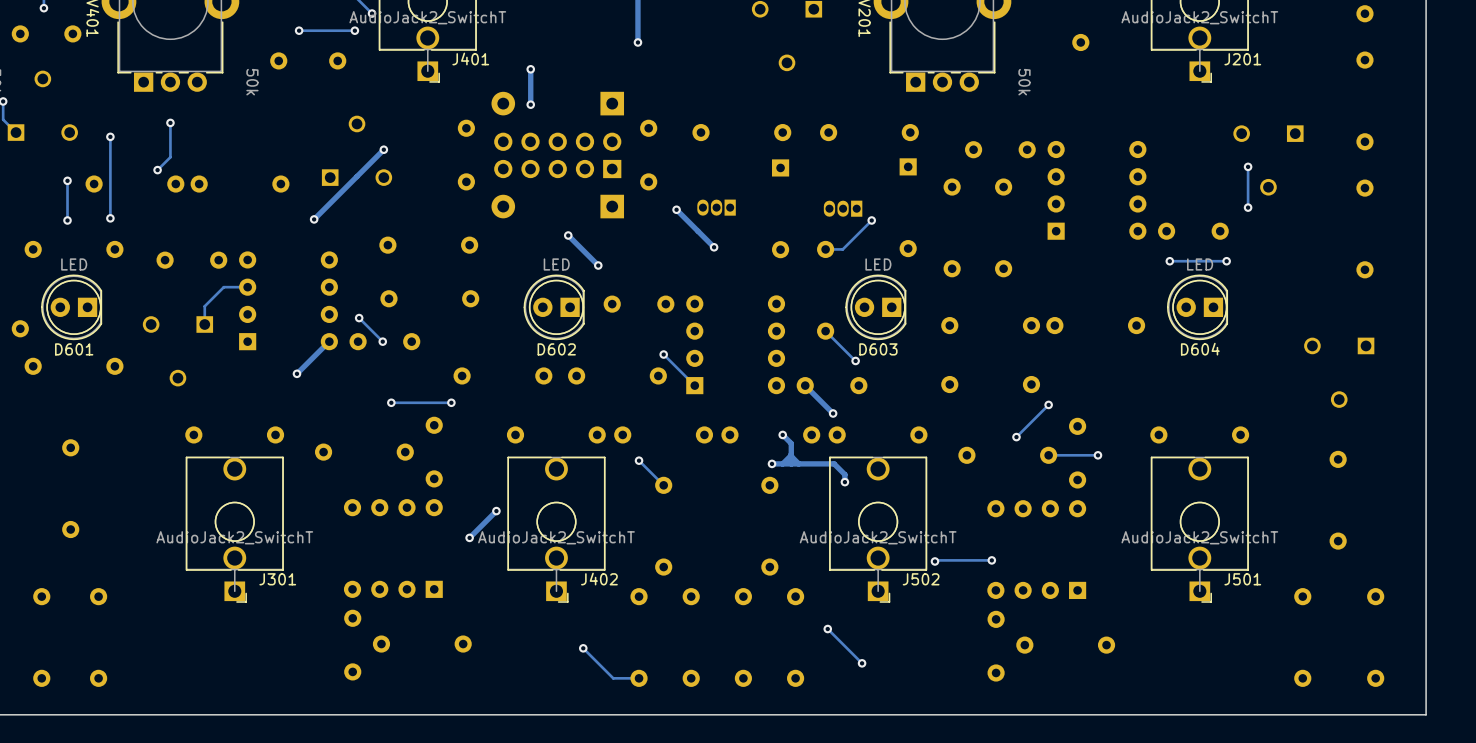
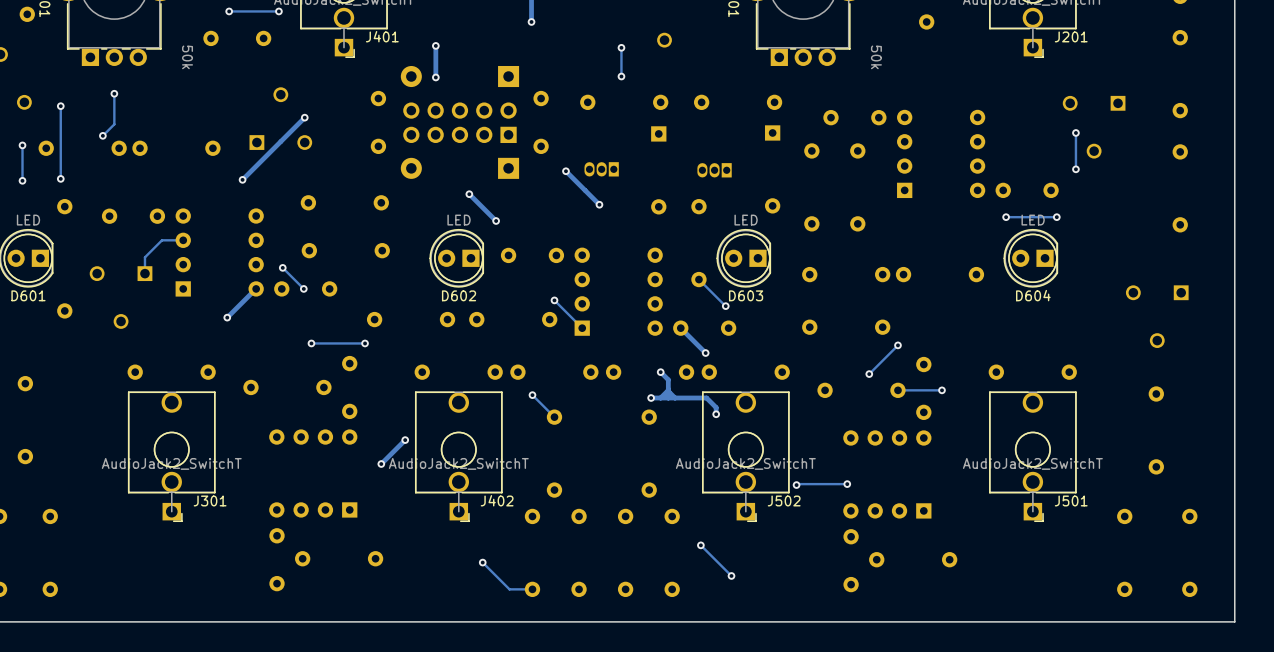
track: none -> (621, 47) (621, 76)
via: none -> (621, 47)
via: none -> (621, 76)
track: (871, 220) (842, 249) (825, 249) -> none
via: (871, 220) -> none

